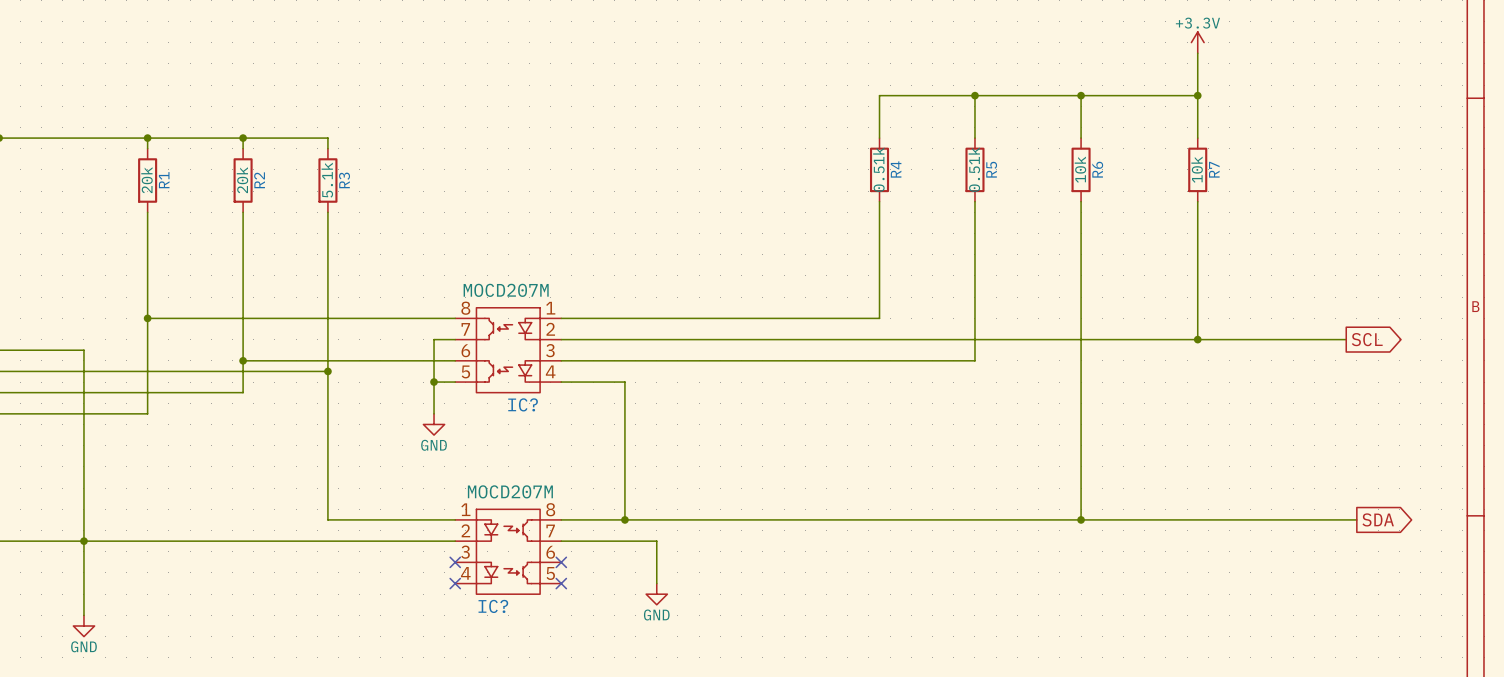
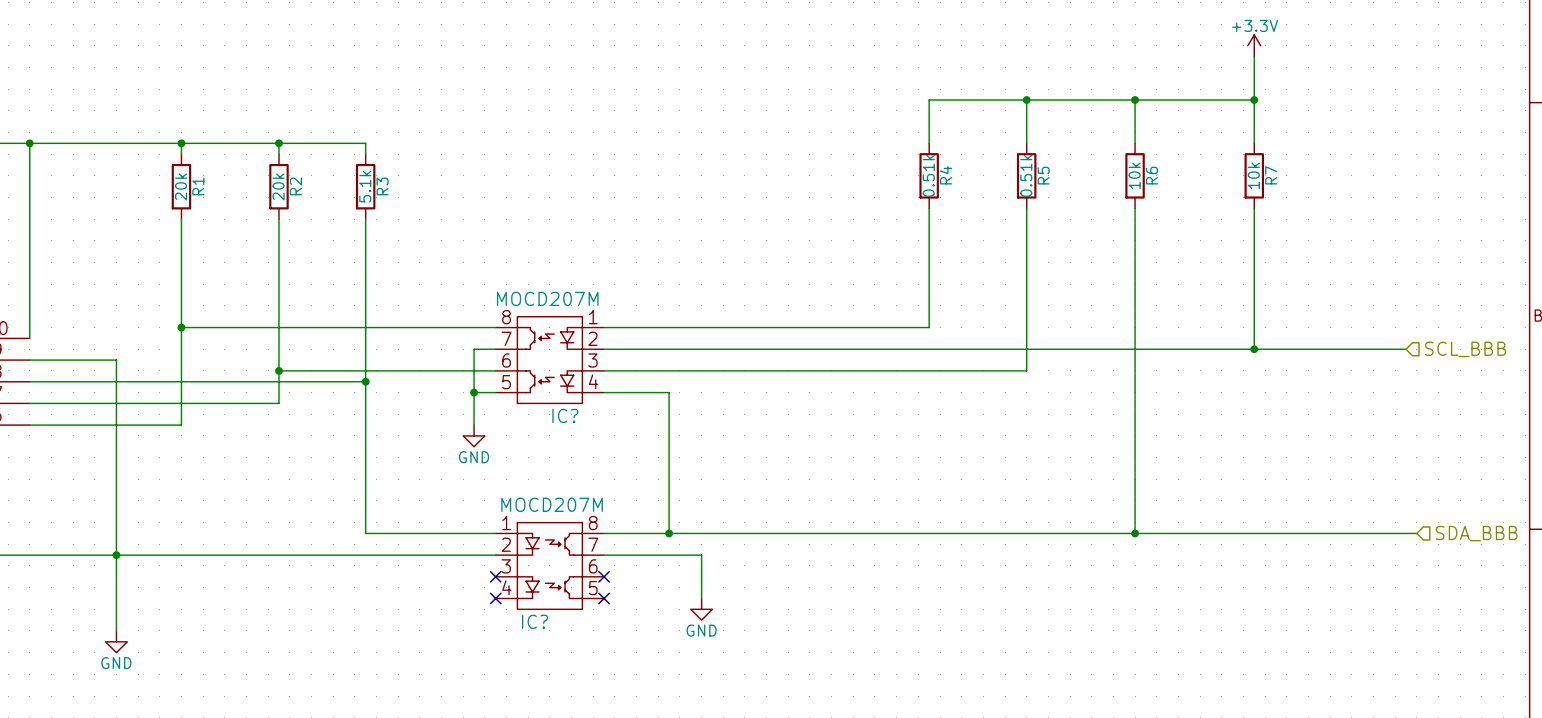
global label: SCL (1367, 339) -> none
hierarchical label: none -> SCL_BBB (1465, 349)
global label: SDA (1378, 519) -> none
hierarchical label: none -> SDA_BBB (1476, 533)

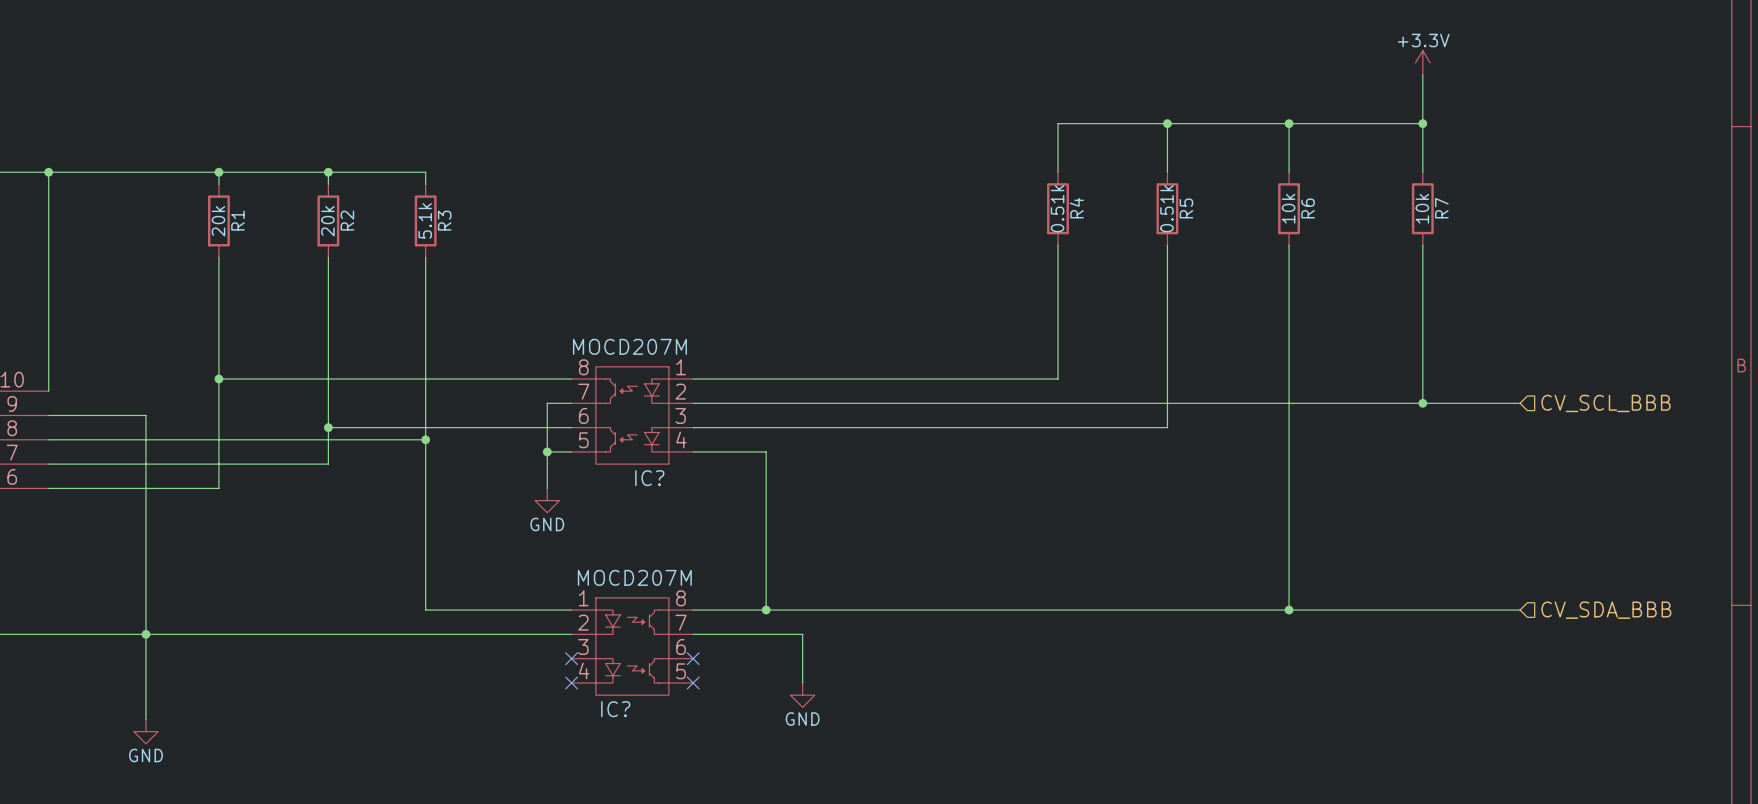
wire: (1340, 349) (1405, 349) -> none
hierarchical label: SCL_BBB (1465, 349) -> CV_SCL_BBB (1606, 403)
wire: (1340, 533) (1416, 533) -> none
hierarchical label: SDA_BBB (1476, 533) -> CV_SDA_BBB (1606, 610)

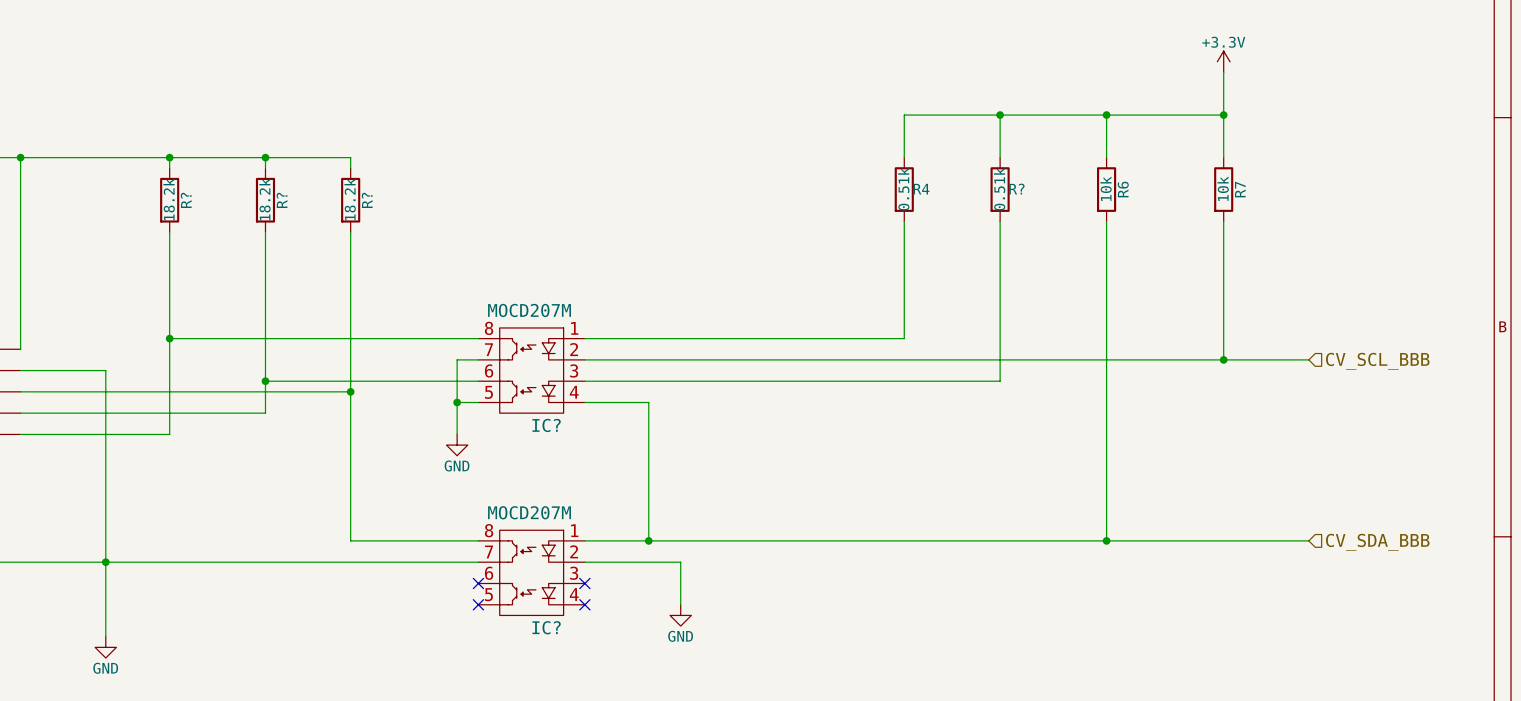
R4 name rotation: 0° (1076, 208) -> 90° clockwise (921, 189)
R5 name: R5 (1186, 208) -> R? (1016, 189)
R1 name: R1 (237, 220) -> R? (186, 200)
R2 name: R2 (347, 220) -> R? (282, 200)
R3 value: 5.1k (425, 220) -> 18.2k (350, 199)
R3 name: R3 (444, 220) -> R? (367, 200)
R1 value: 20k (218, 221) -> 18.2k (169, 199)
R2 value: 20k (327, 221) -> 18.2k (264, 199)
IC? flip: as is (632, 646) -> left-right (531, 572)

